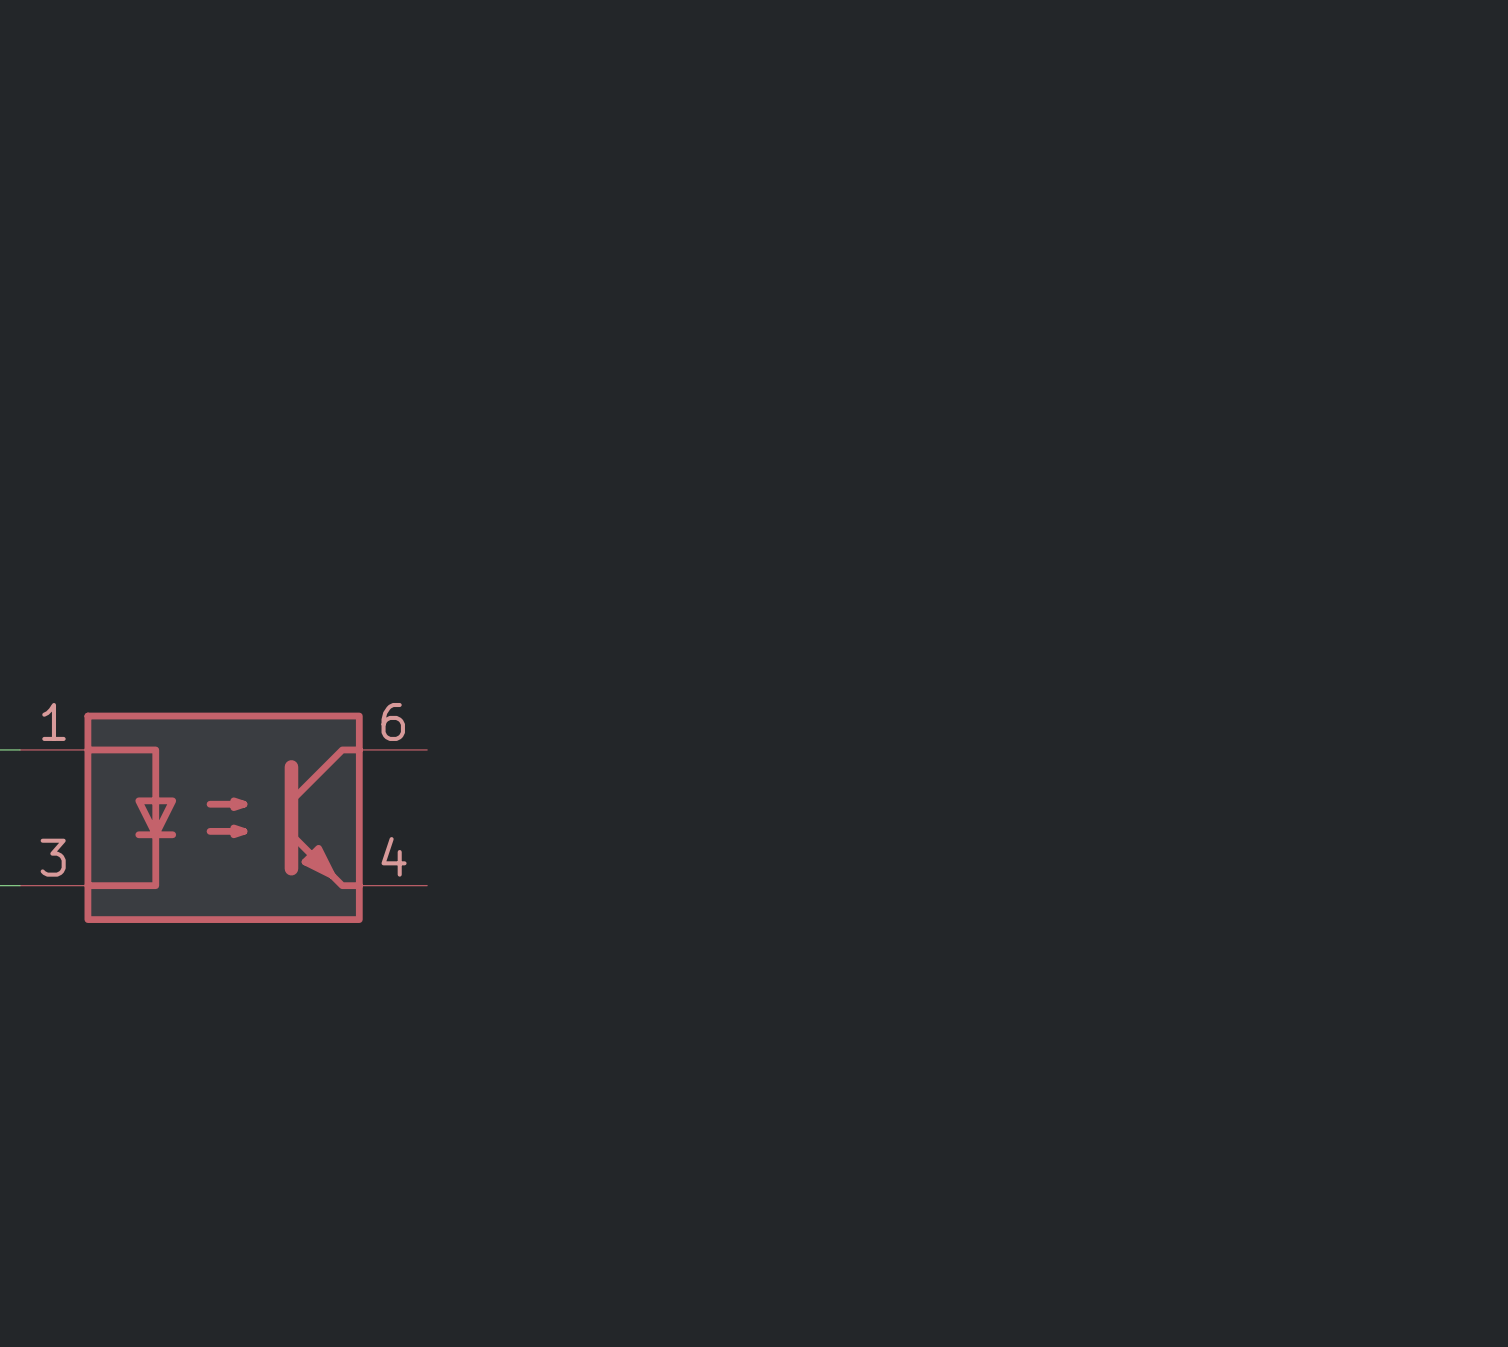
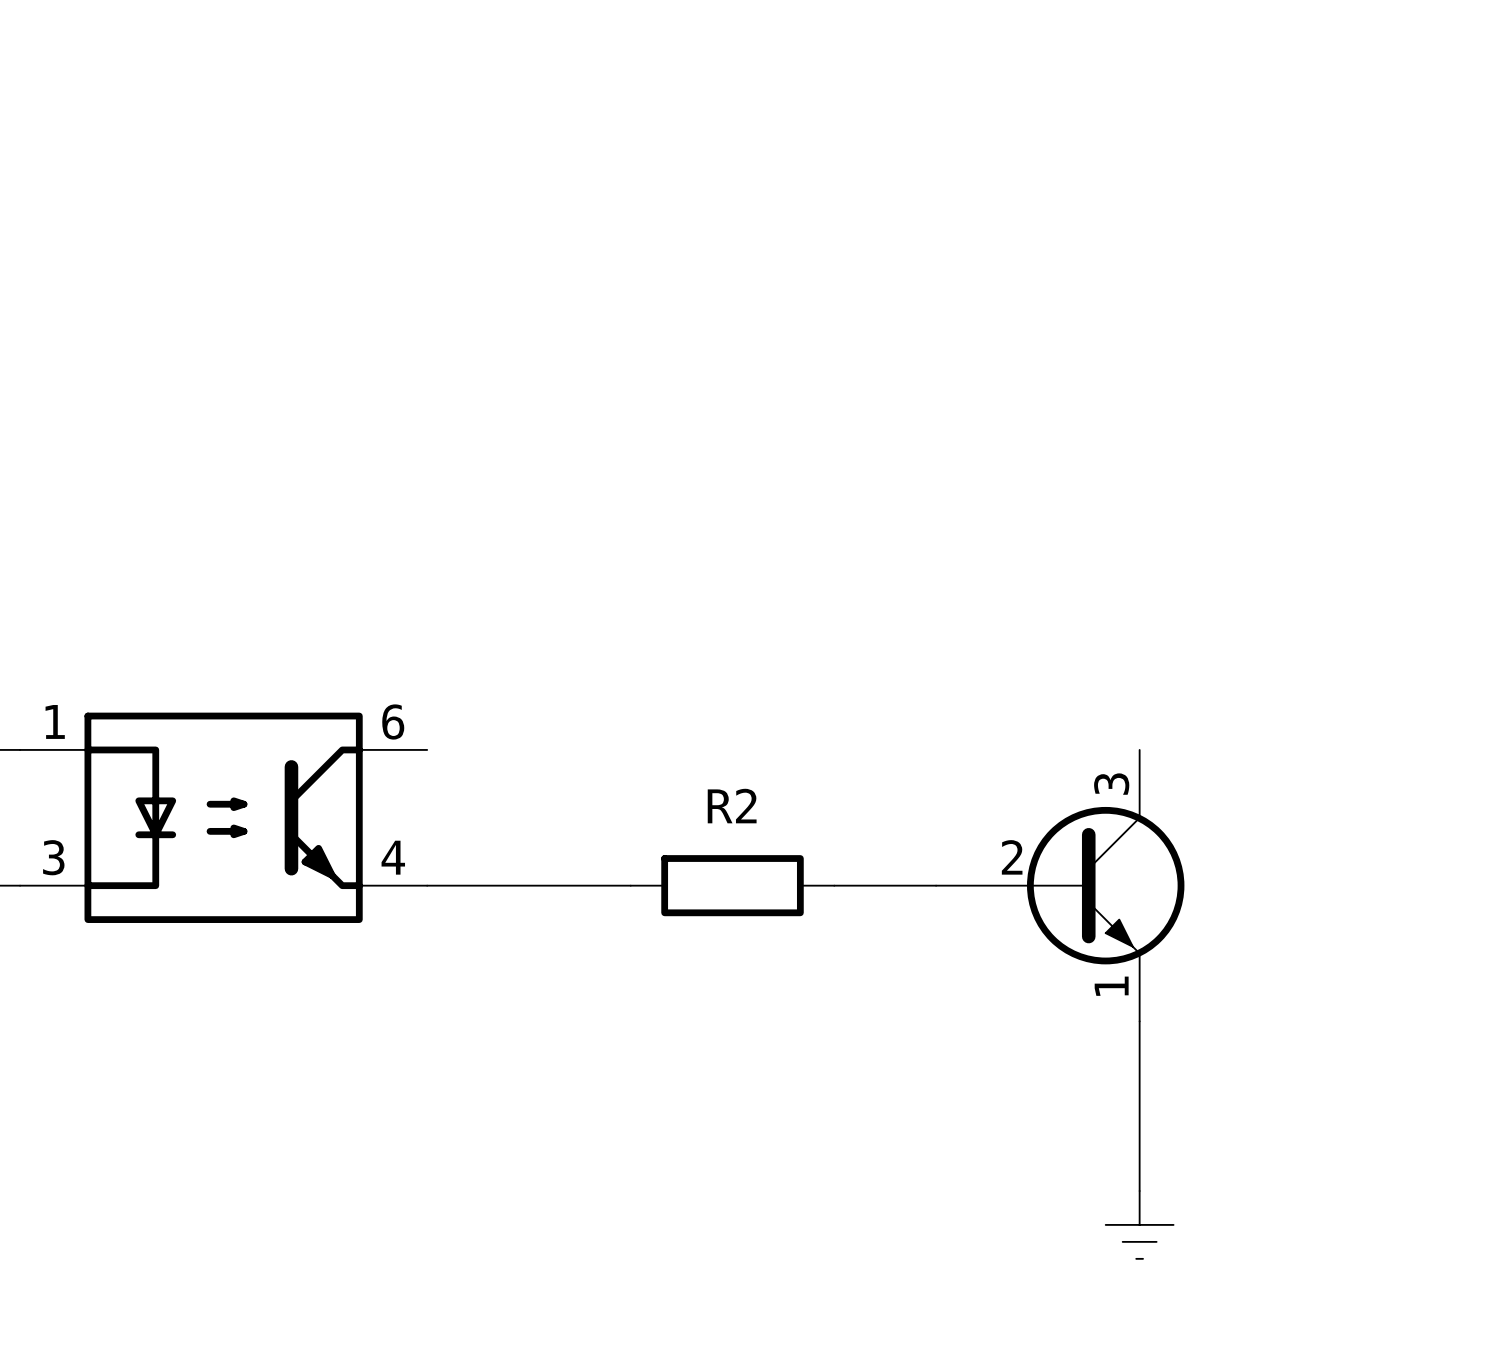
wire: none -> (427, 885) (630, 885)
R2: none -> (732, 885)
wire: none -> (834, 885) (936, 885)
part: none -> (1060, 885)
wire: none -> (1139, 1021) (1139, 1191)
power symbol: none -> (1139, 1224)

